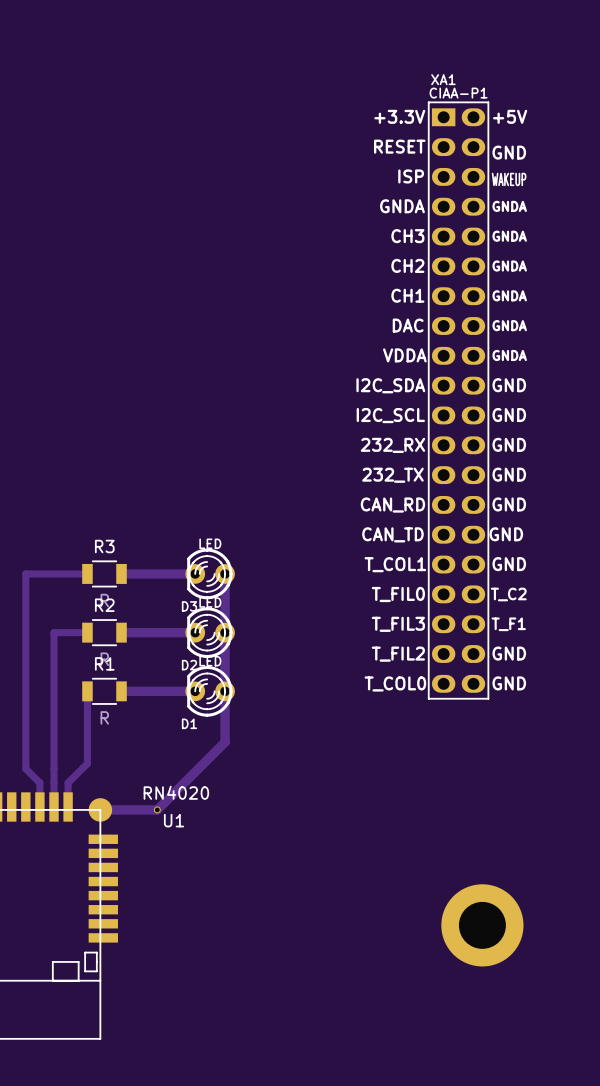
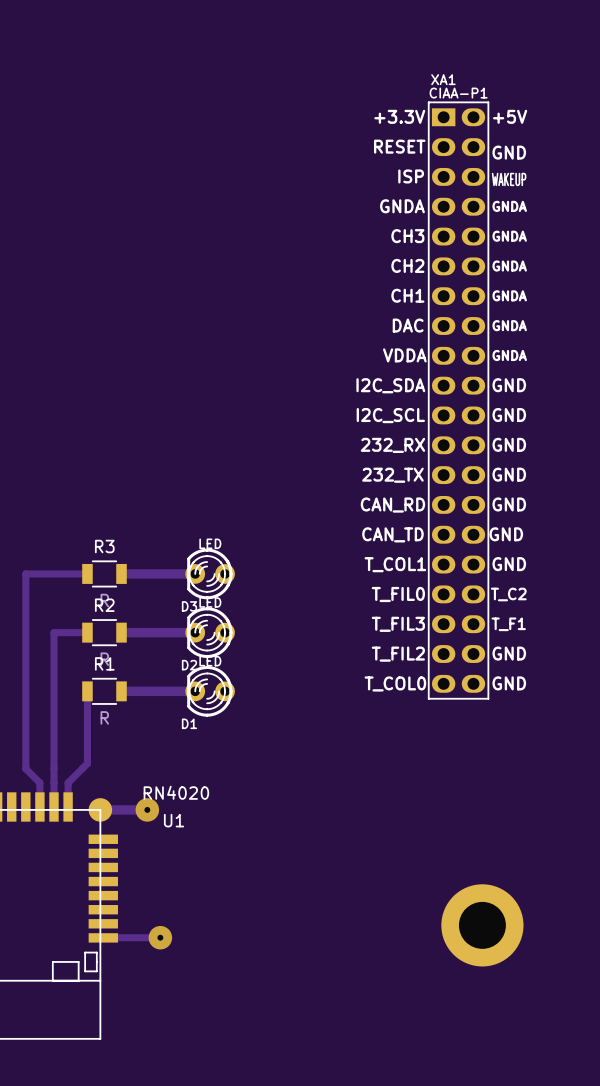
track: (225, 573) (225, 742) (157, 809) (147, 809) -> none
via size: [153, 806, 161, 814] -> [135, 798, 160, 822]
track: none -> (113, 937) (160, 937)
via: none -> (160, 937)

